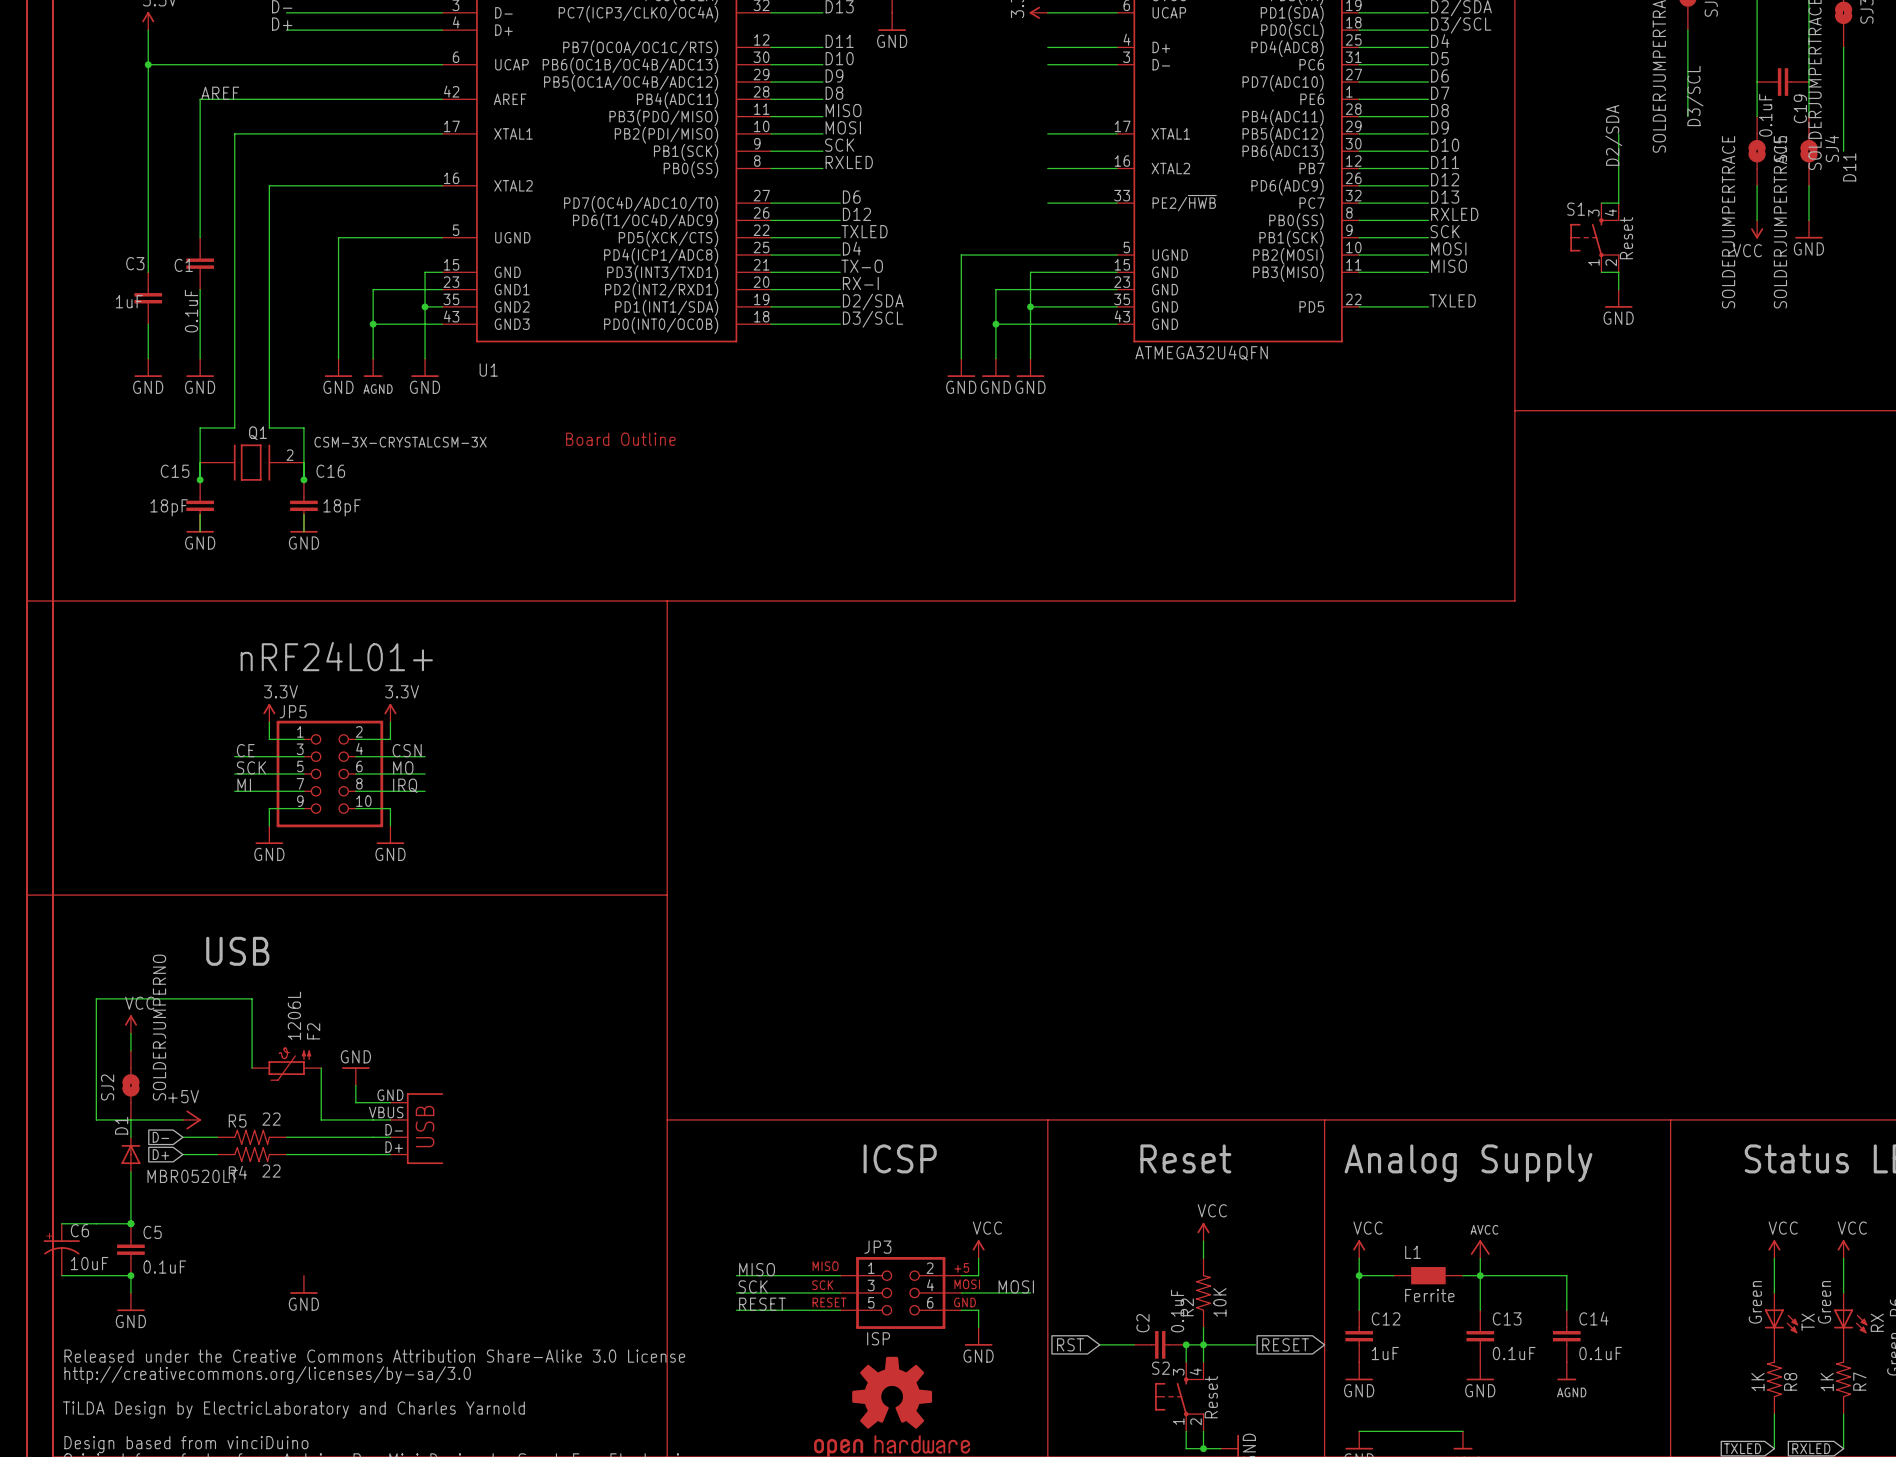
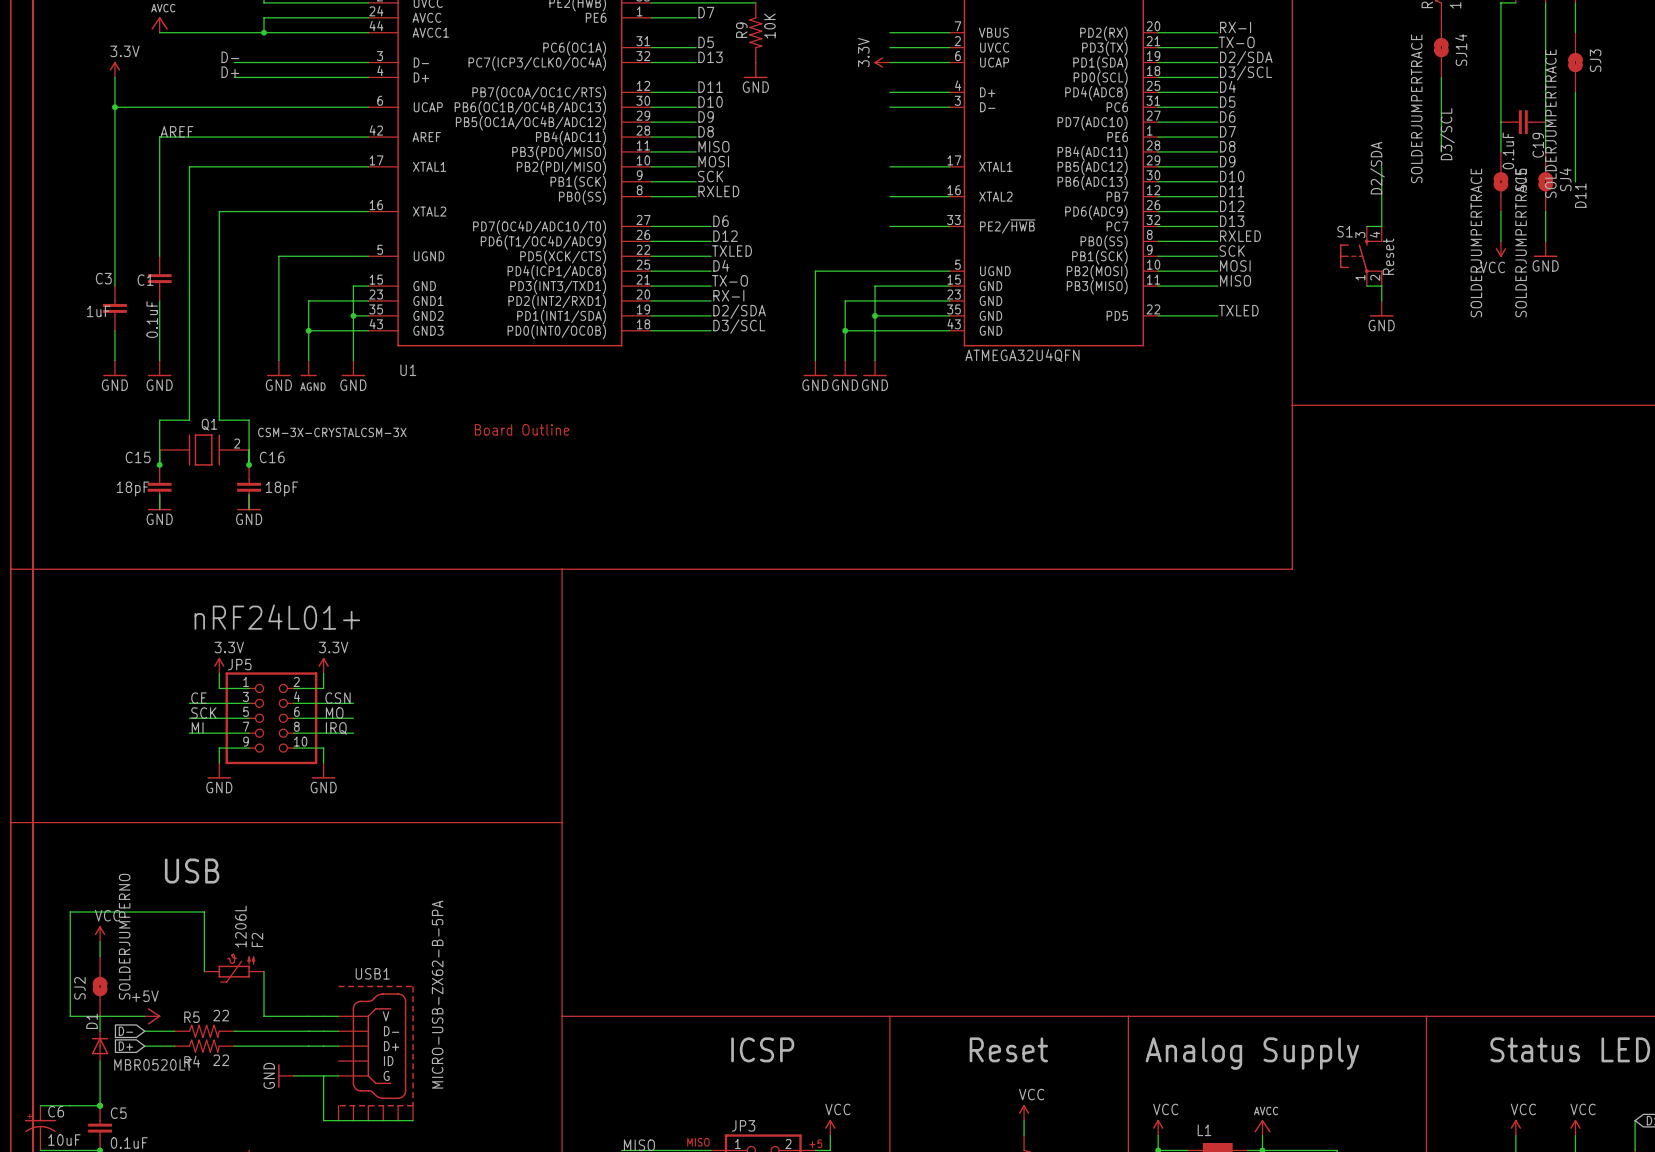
power symbol rotation: 0° (355, 1068) -> 90° counterclockwise (278, 1075)
power symbol position: GND (355, 1076) -> GND (285, 1075)
wire: (355, 1085) (355, 1102) (390, 1102) -> none
part: (416, 1128) -> none
USB1: none -> MICRO-USB-ZX62-B-5PA (375, 1053)
wire: none -> (293, 1075) (338, 1075)
wire: none -> (323, 1075) (323, 1120) (413, 1120)

